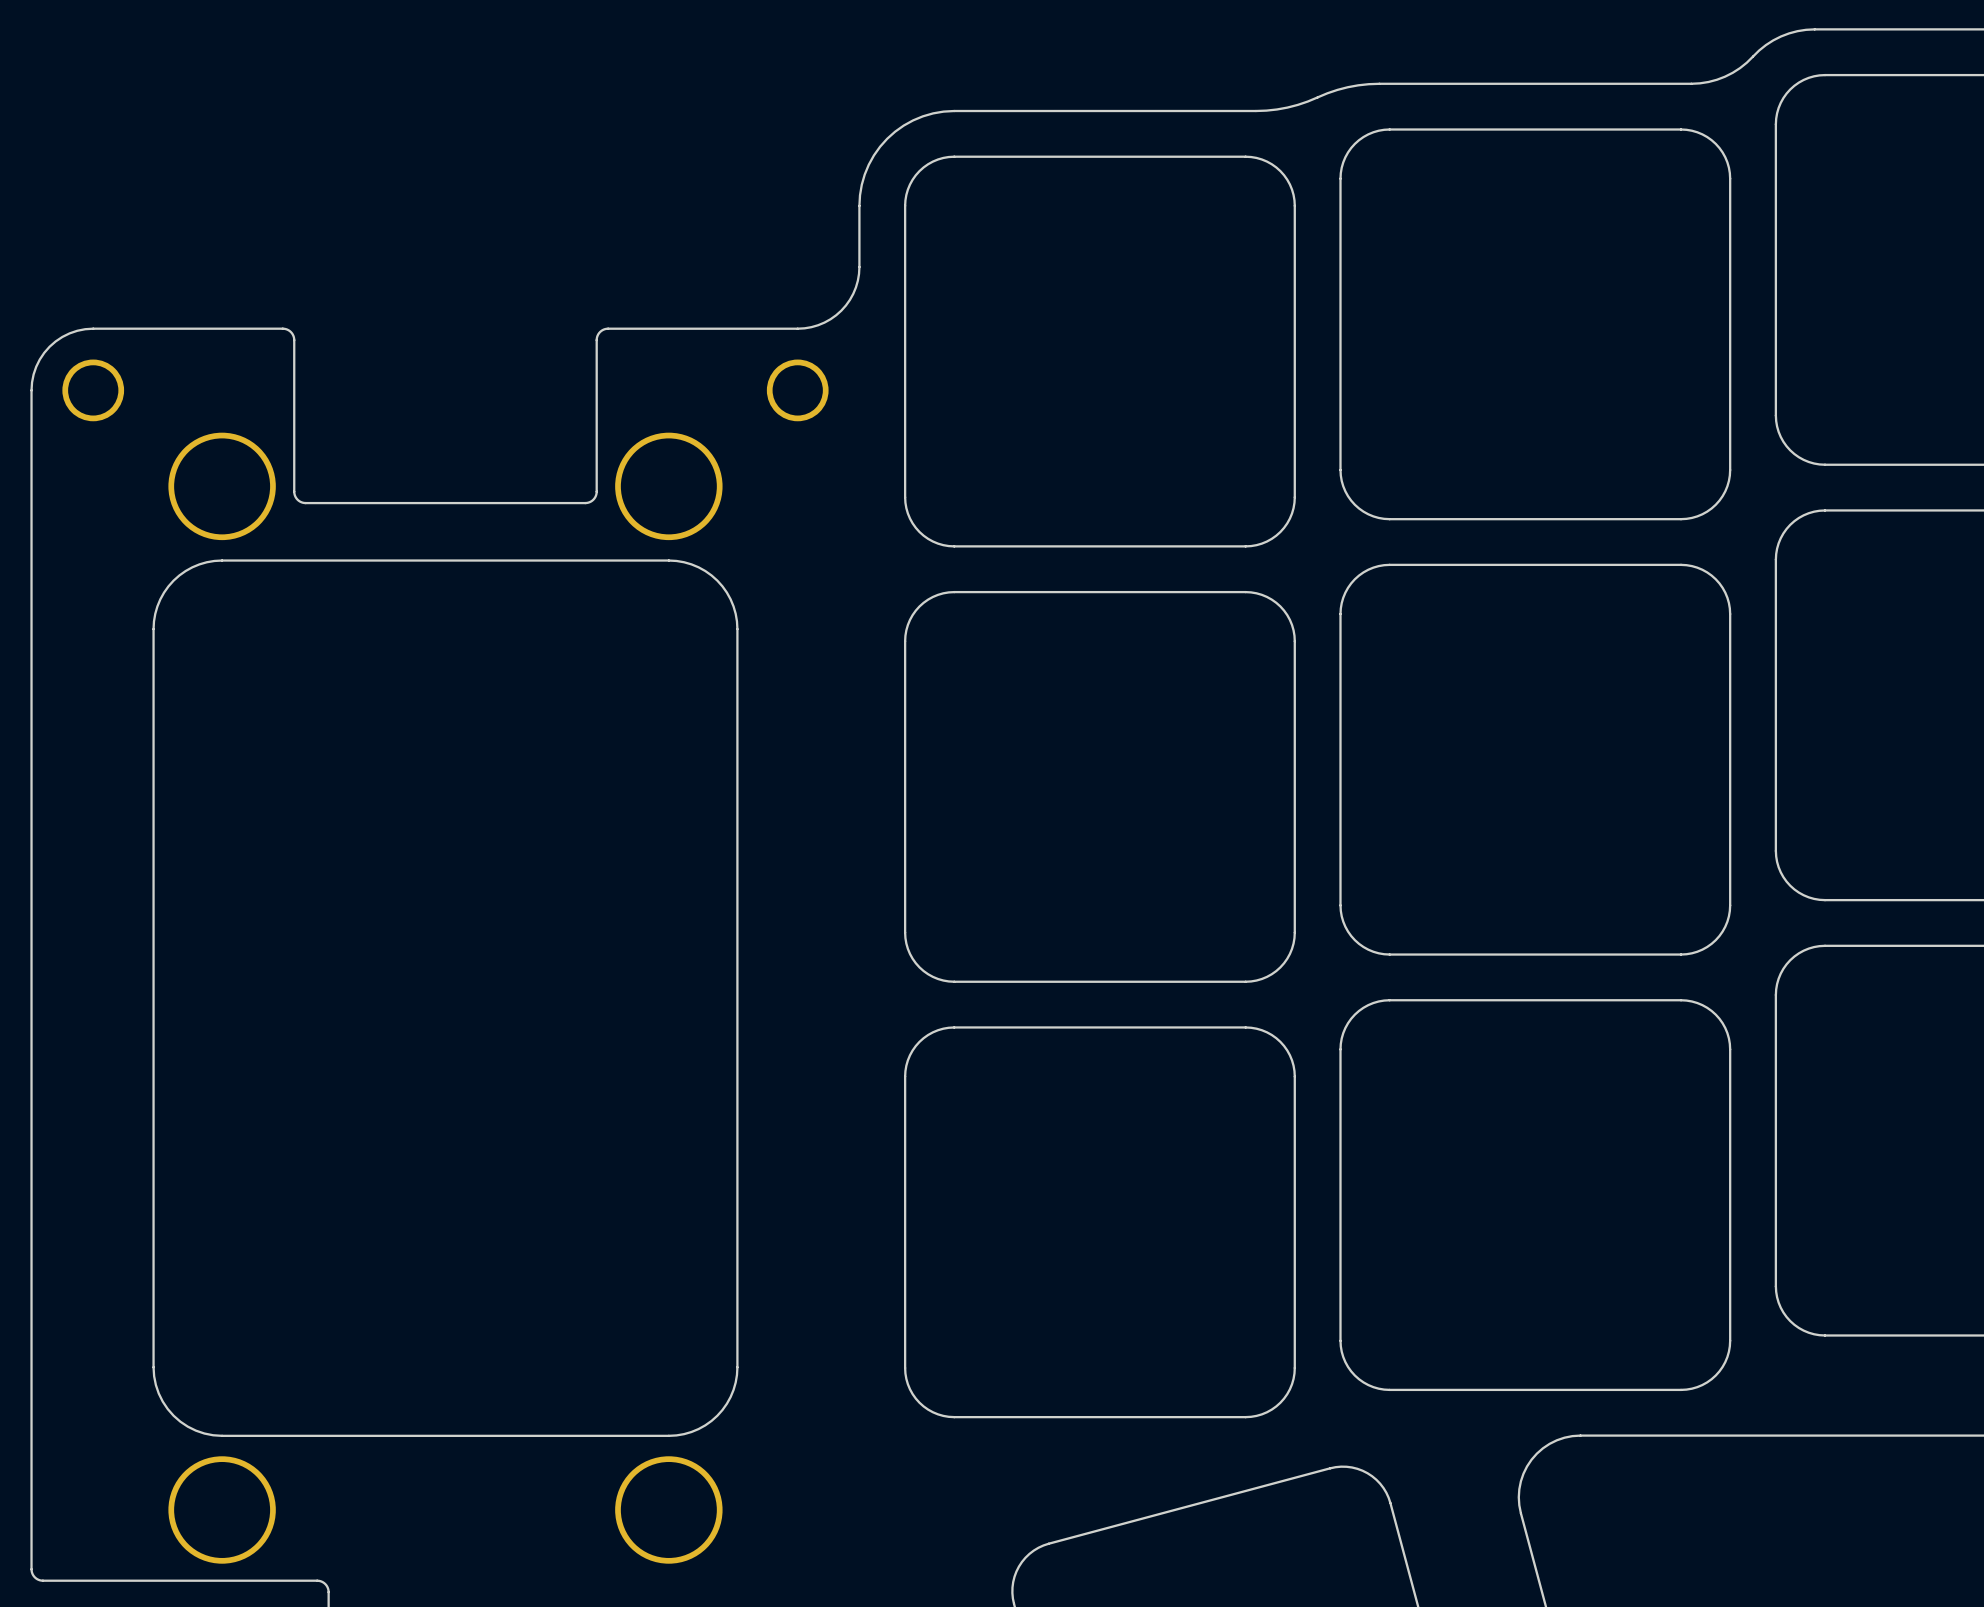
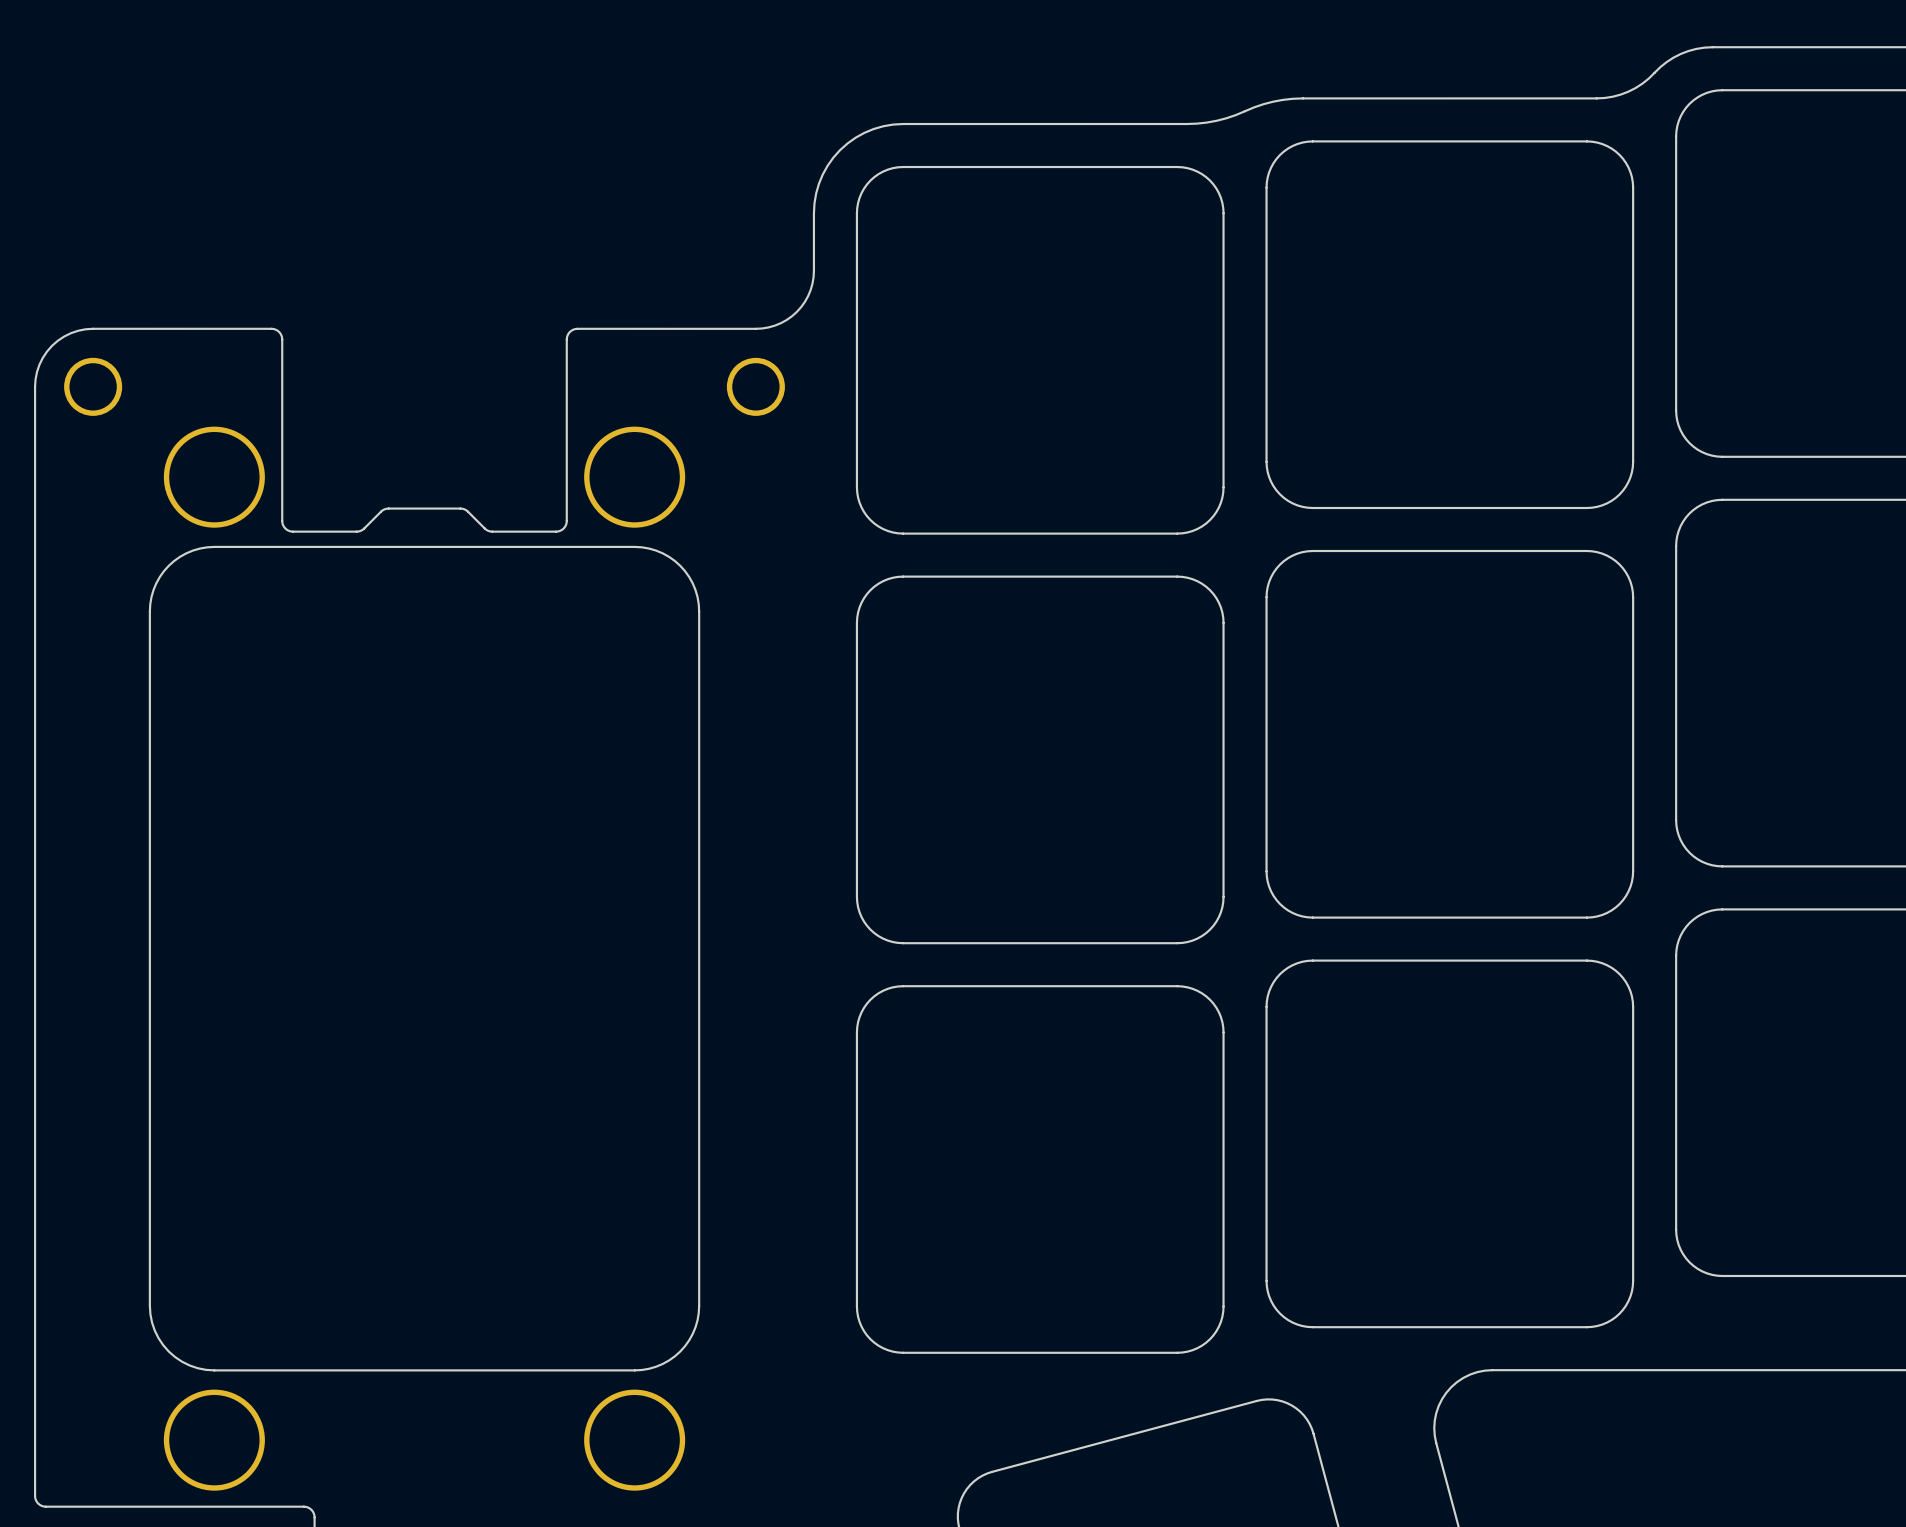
board edge: (294, 491) (297, 499) (305, 503) (585, 503) (593, 499) (596, 491) -> (282, 482) (282, 523) (286, 529) (292, 531) (359, 531) (382, 510) (388, 508) (461, 508) (466, 510) (489, 531) (558, 531) (564, 527) (566, 522) (566, 482)

